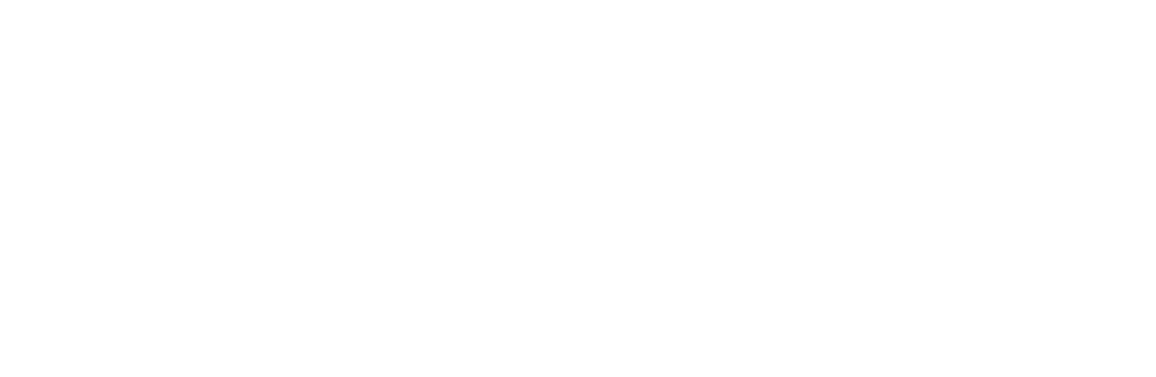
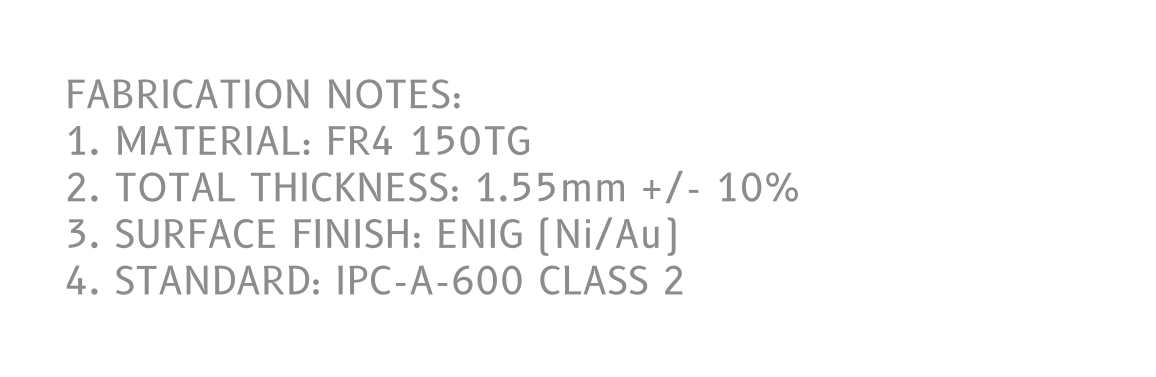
text: none -> FABRICATION NOTES: (263, 93)
text: none -> 1. MATERIAL: FR4 150TG (298, 140)
text: none -> 2. TOTAL THICKNESS: 1.55mm +/- 10% (432, 187)
text: none -> 3. SURFACE FINISH: ENIG (Ni/Au) (372, 236)
text: none -> 4. STANDARD: IPC-A-600 CLASS 2 (374, 280)

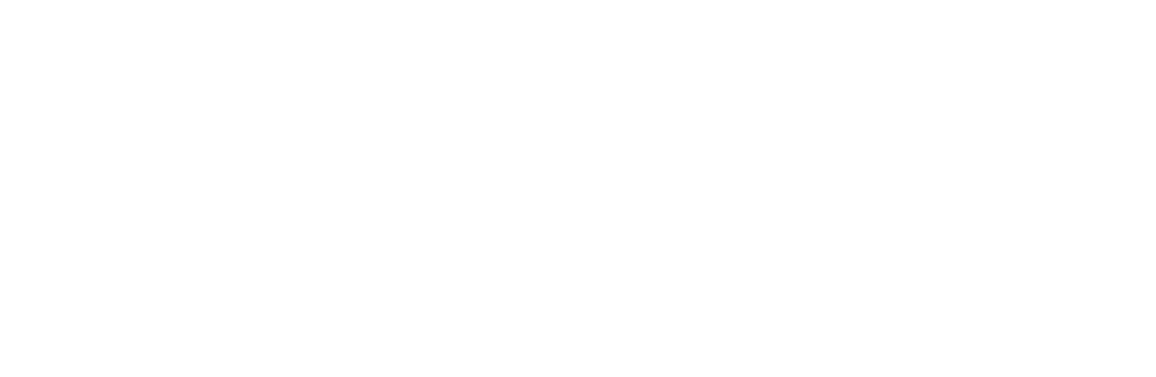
text: FABRICATION NOTES: (263, 93) -> none
text: 1. MATERIAL: FR4 150TG (298, 140) -> none
text: 2. TOTAL THICKNESS: 1.55mm +/- 10% (432, 187) -> none
text: 3. SURFACE FINISH: ENIG (Ni/Au) (372, 236) -> none
text: 4. STANDARD: IPC-A-600 CLASS 2 (374, 280) -> none

